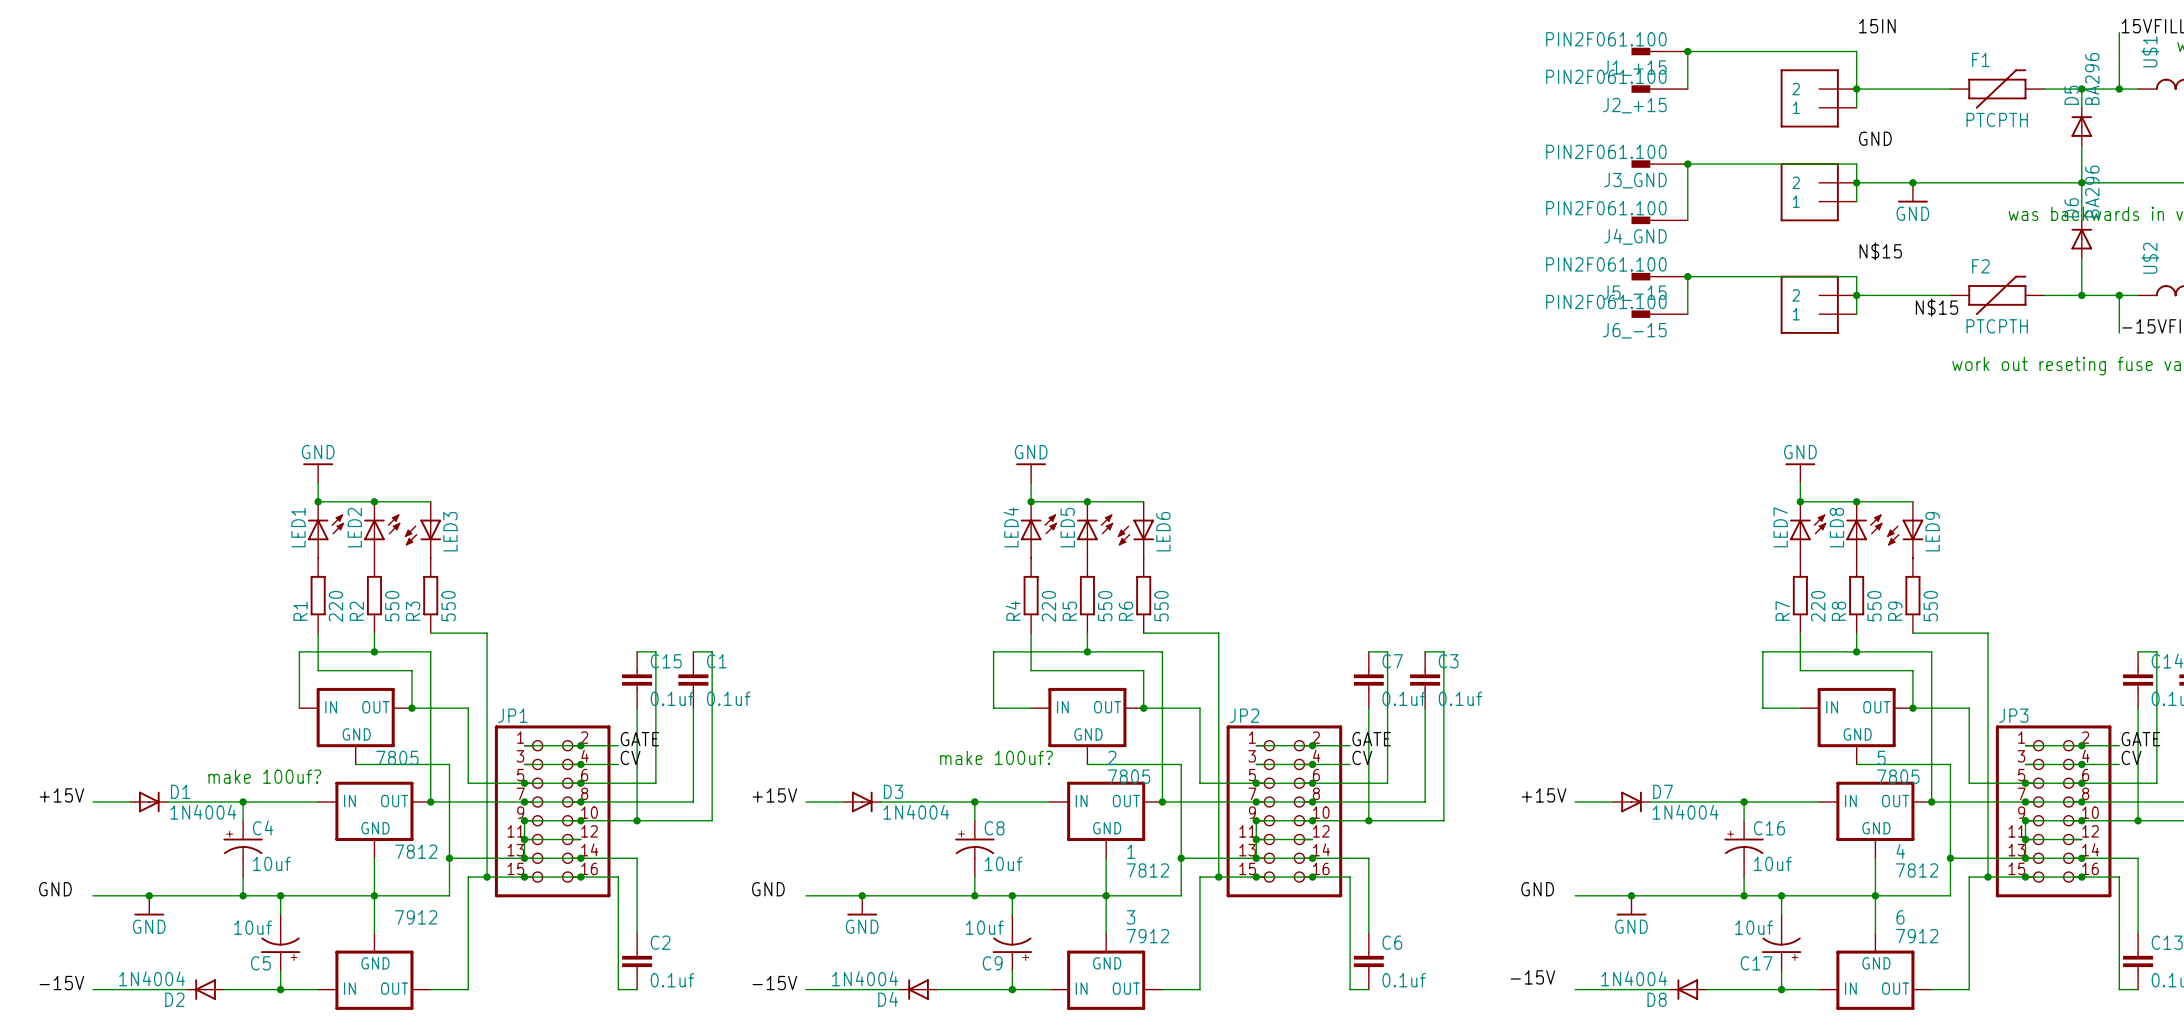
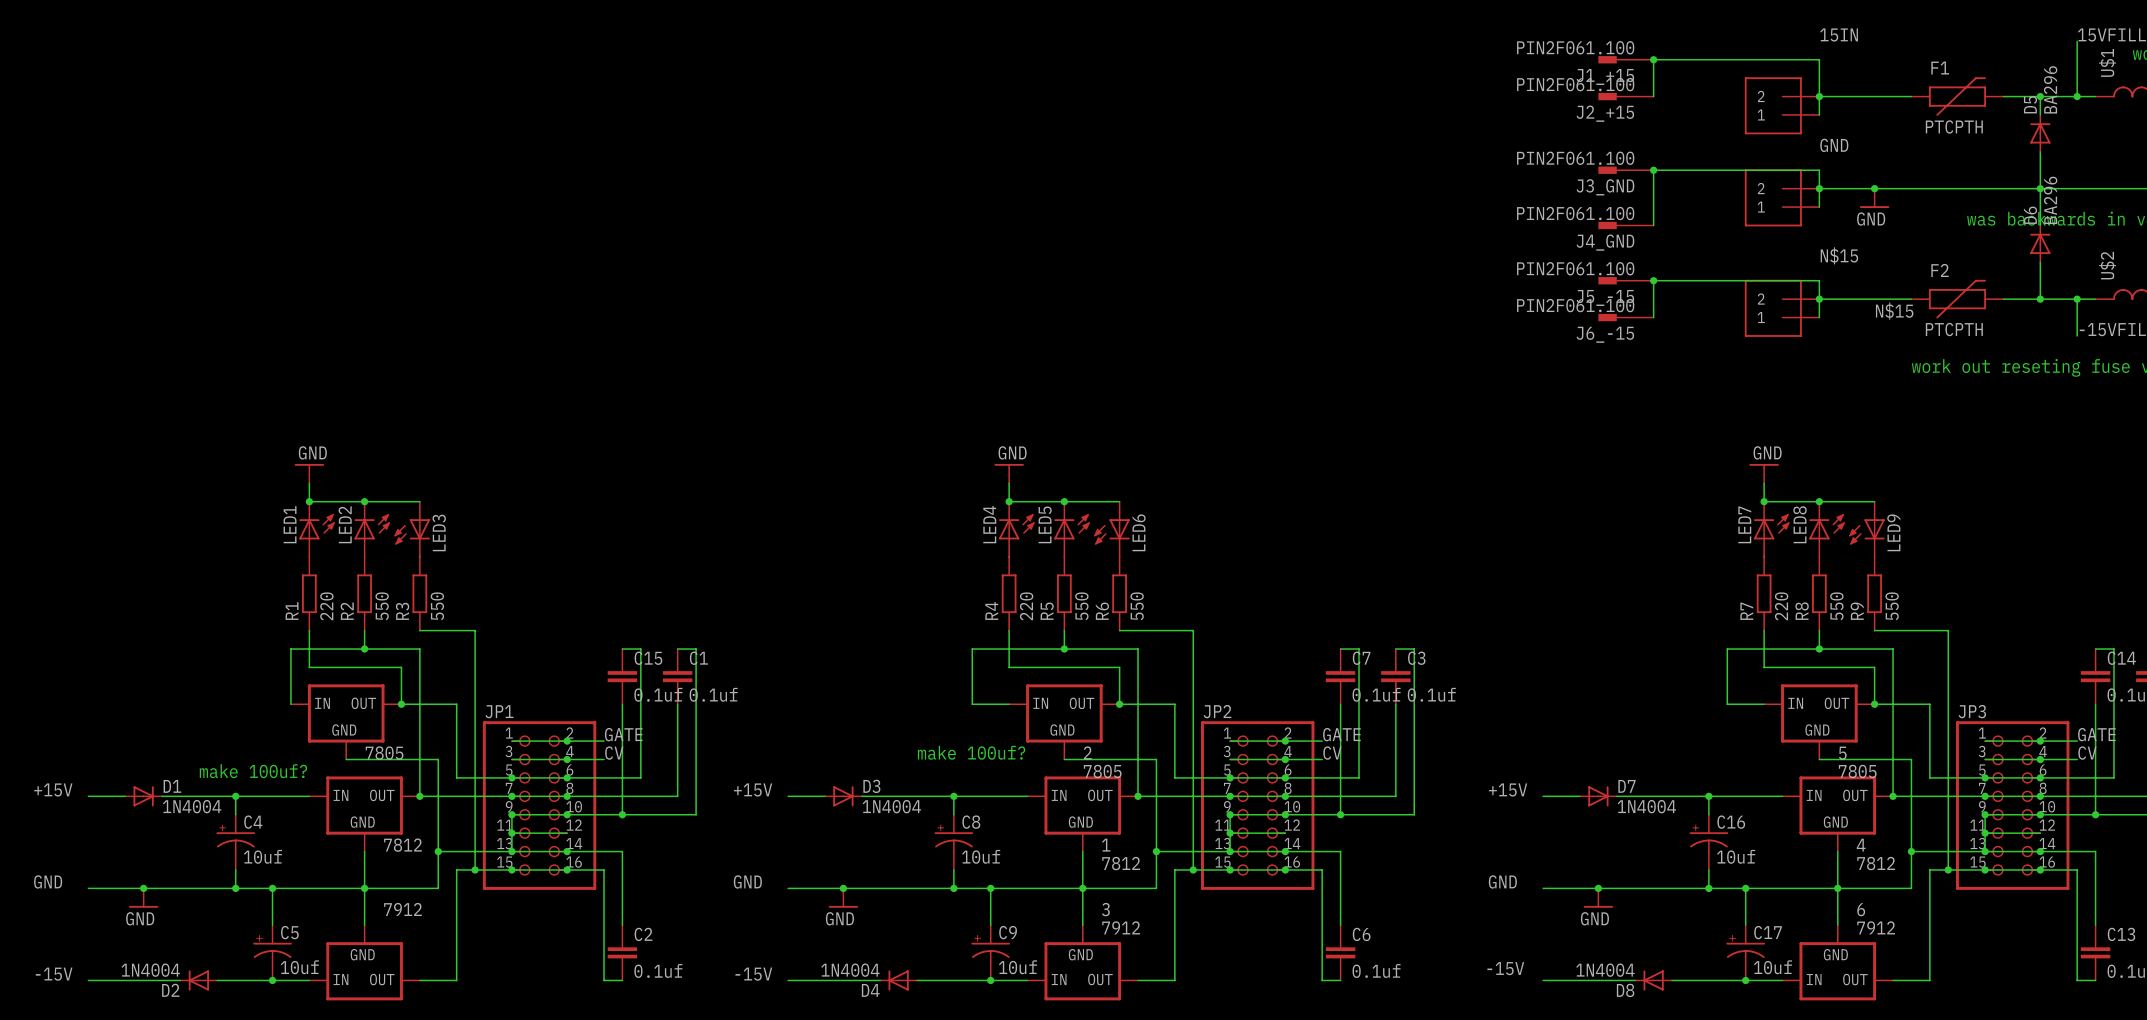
C5 rotation: 0° (280, 946) -> 180° (272, 948)
C9 rotation: 0° (1012, 946) -> 180° (990, 948)
C17 rotation: 0° (1781, 946) -> 180° (1745, 948)

